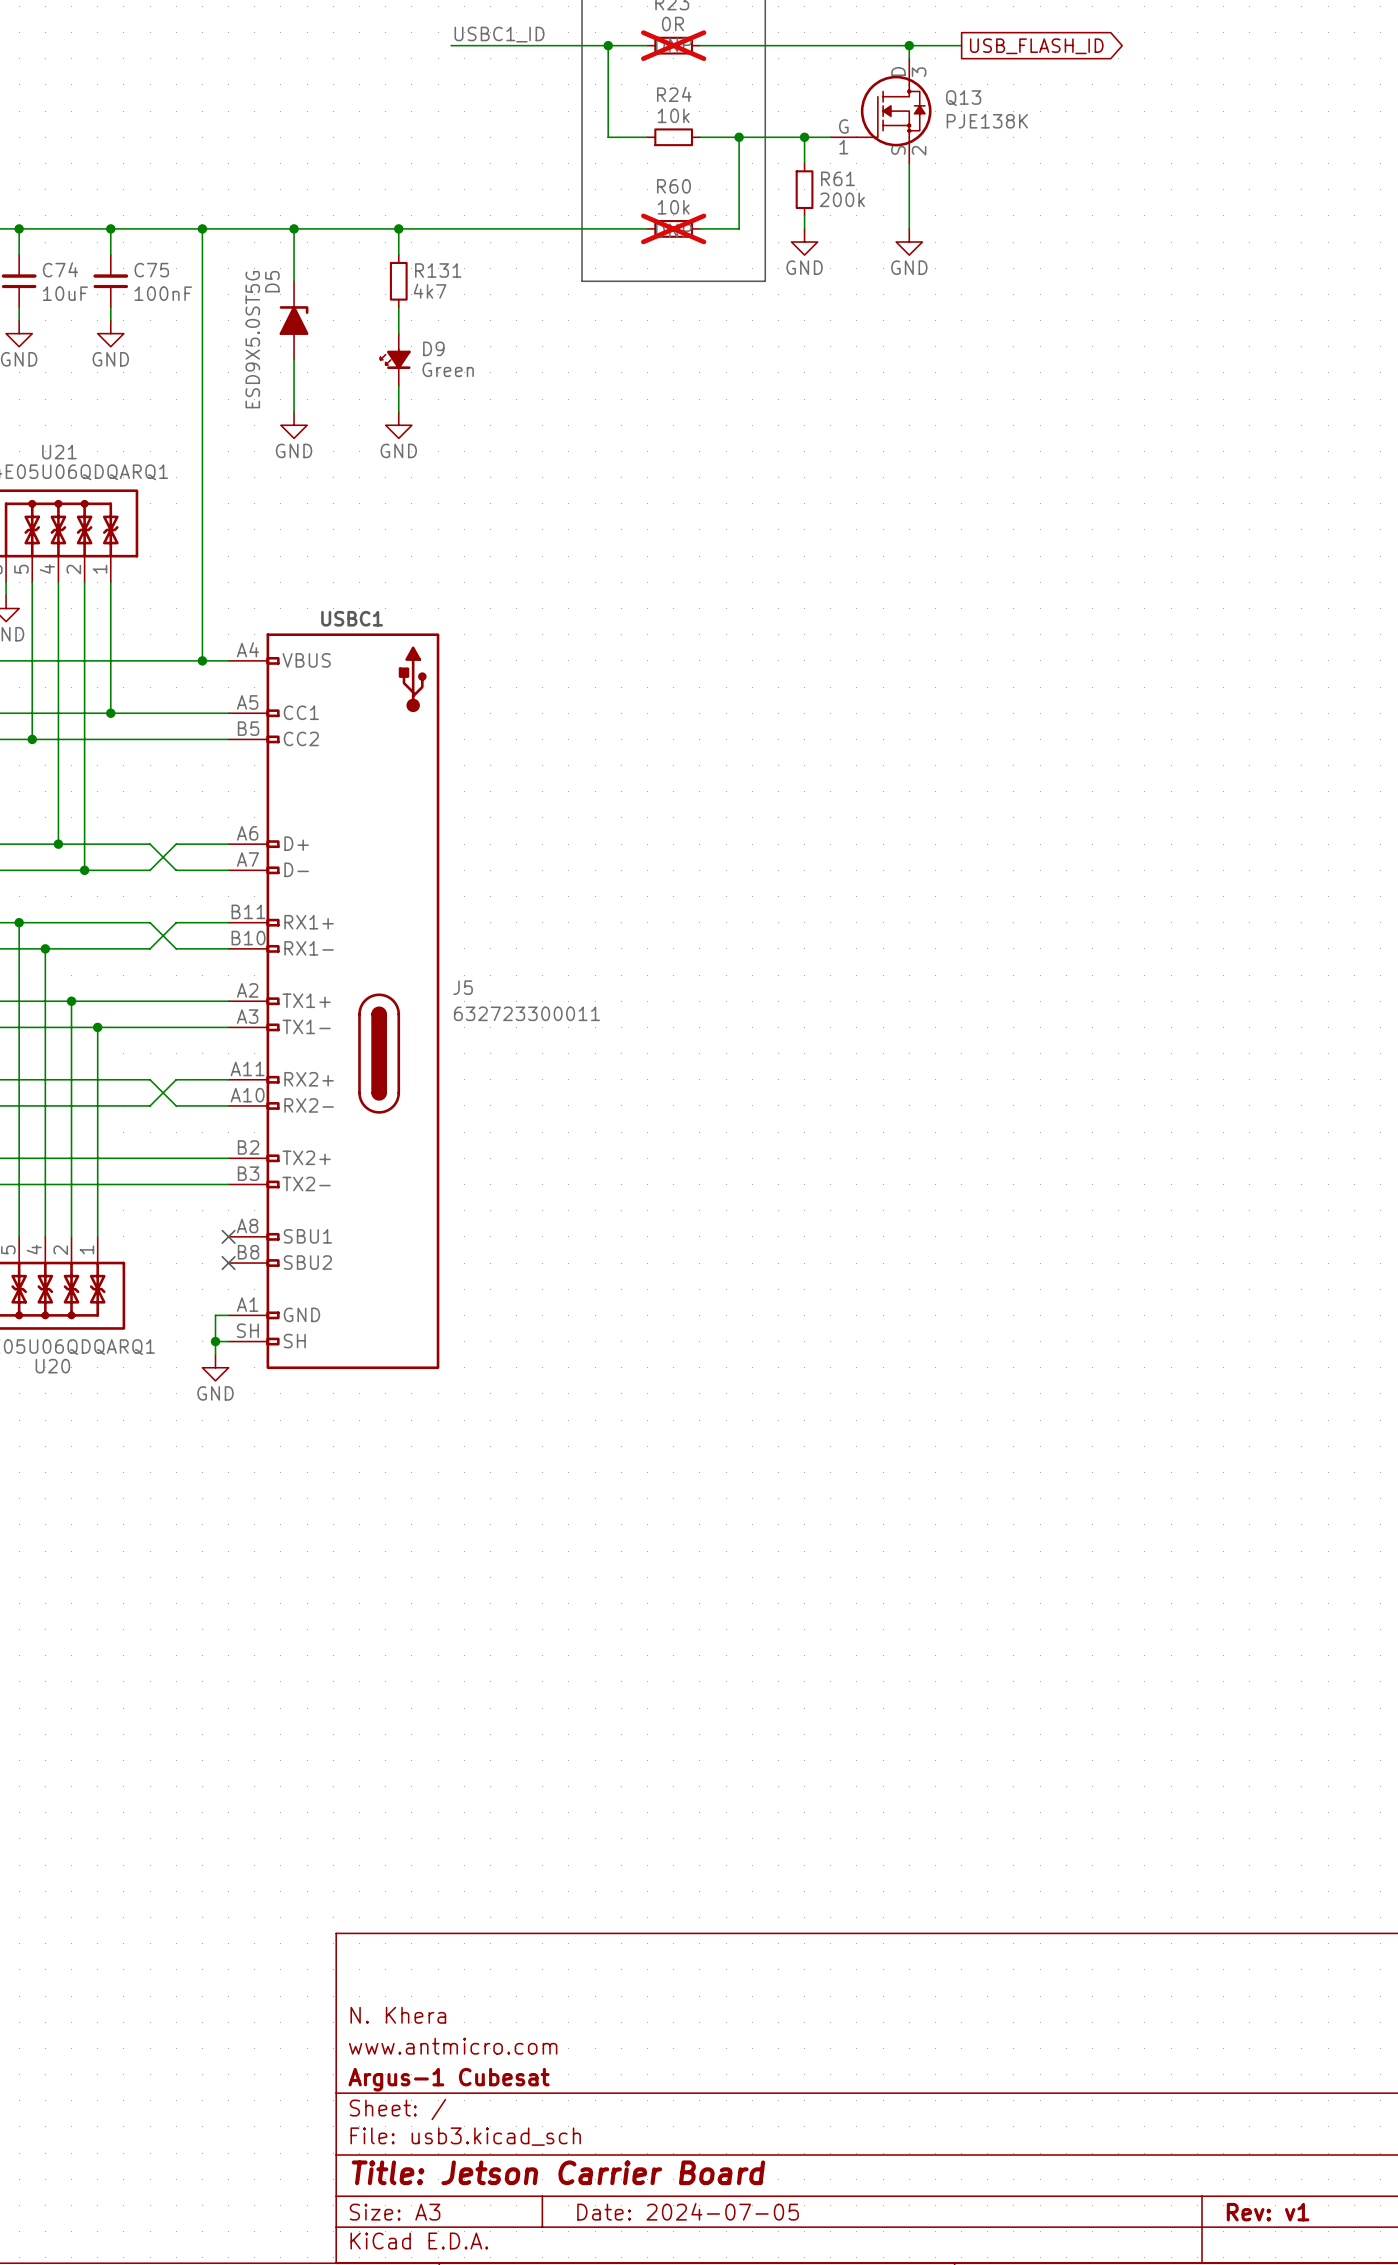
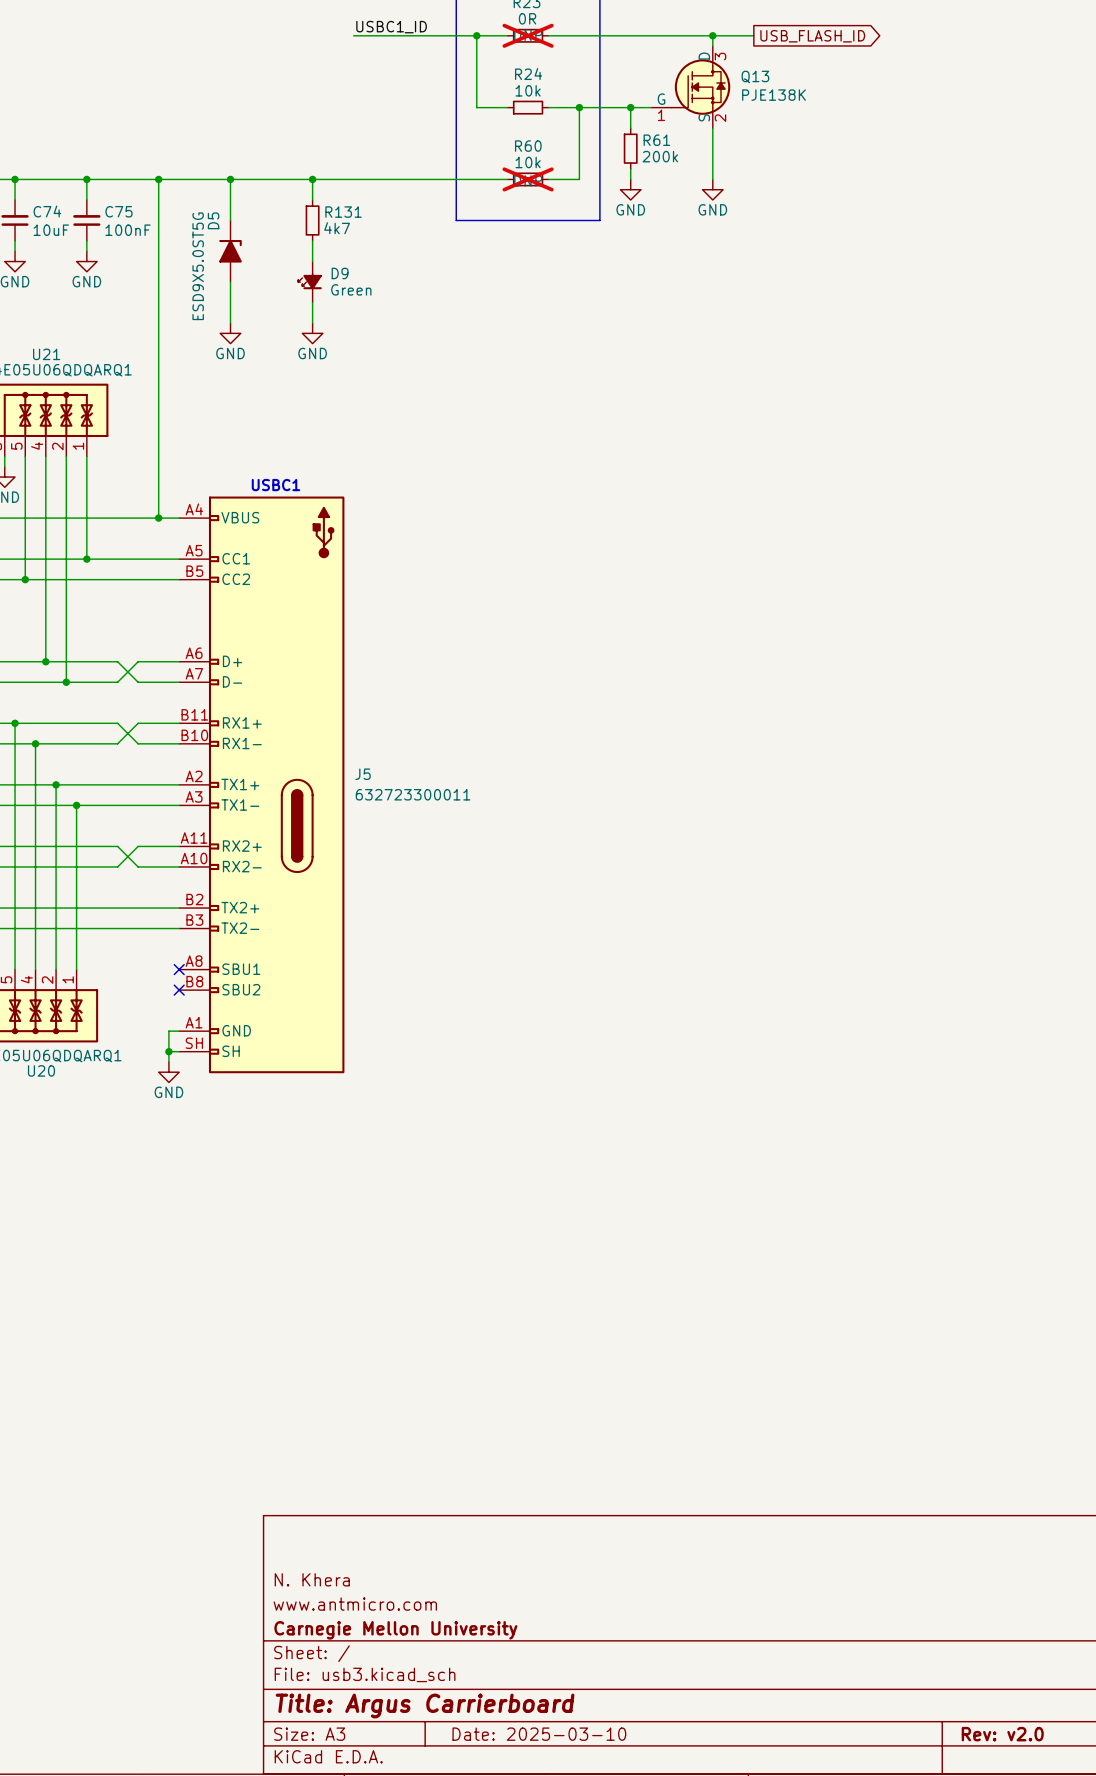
title block: Argus-1 Cubesat (449, 2079) -> Carnegie Mellon University (395, 1630)
title block: Title: Jetson Carrier Board (558, 2172) -> Title: Argus Carrierboard (425, 1705)
title block: Date: 2024-07-05 (688, 2211) -> Date: 2025-03-10 (539, 1734)
title block: Rev: v1 (1268, 2212) -> Rev: v2.0 (1002, 1734)

